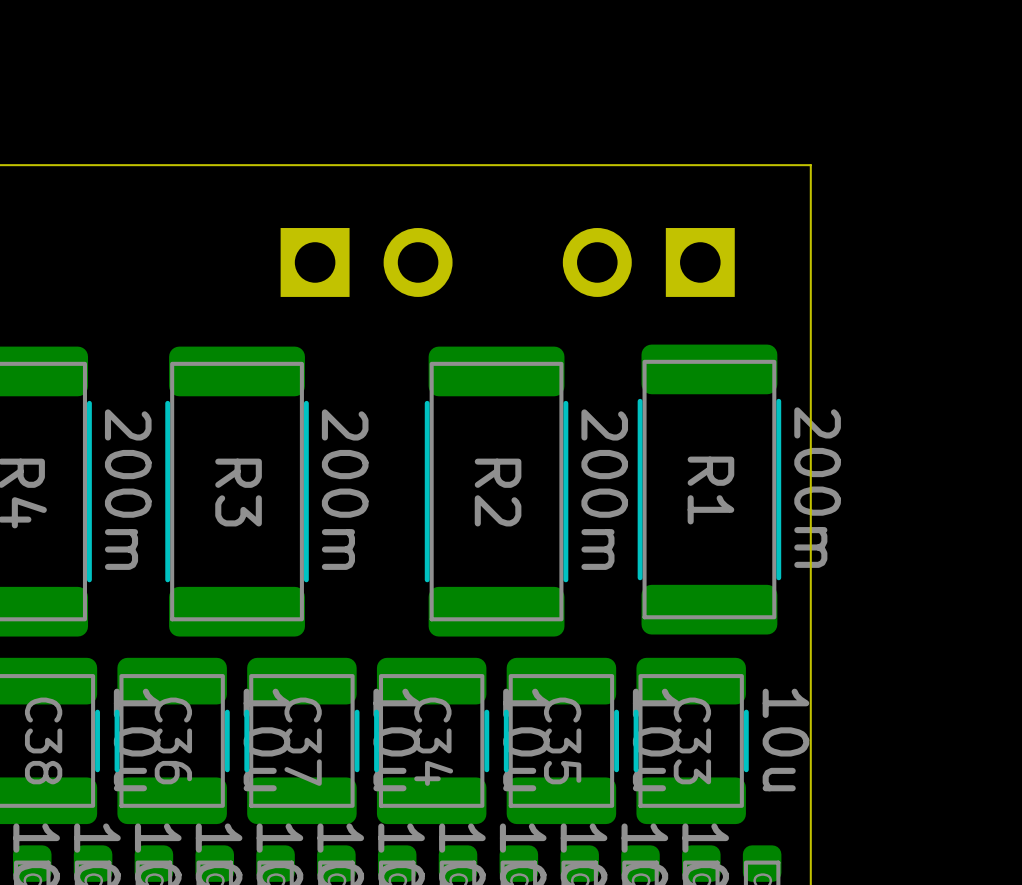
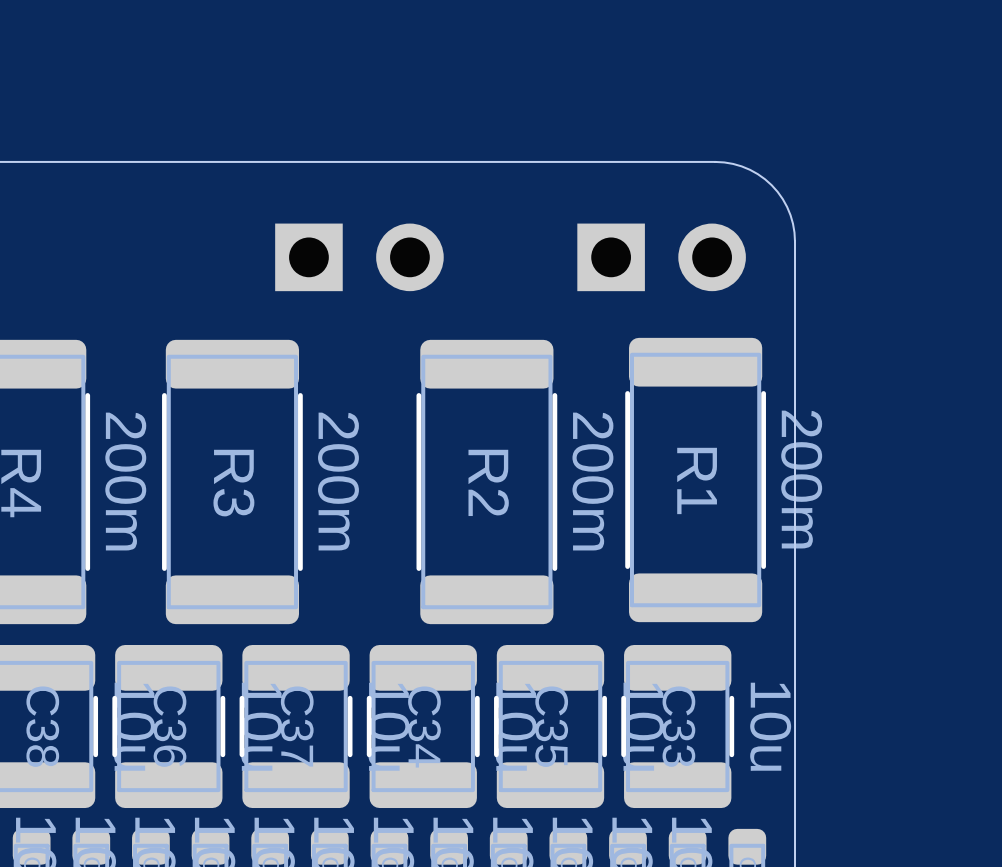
board edge: (729, 165) (810, 165) (810, 246) -> (715, 161) (741, 166) (757, 174) (771, 185) (787, 206) (793, 223) (795, 241)
part rotation: 0° (648, 262) -> 180° (661, 257)

